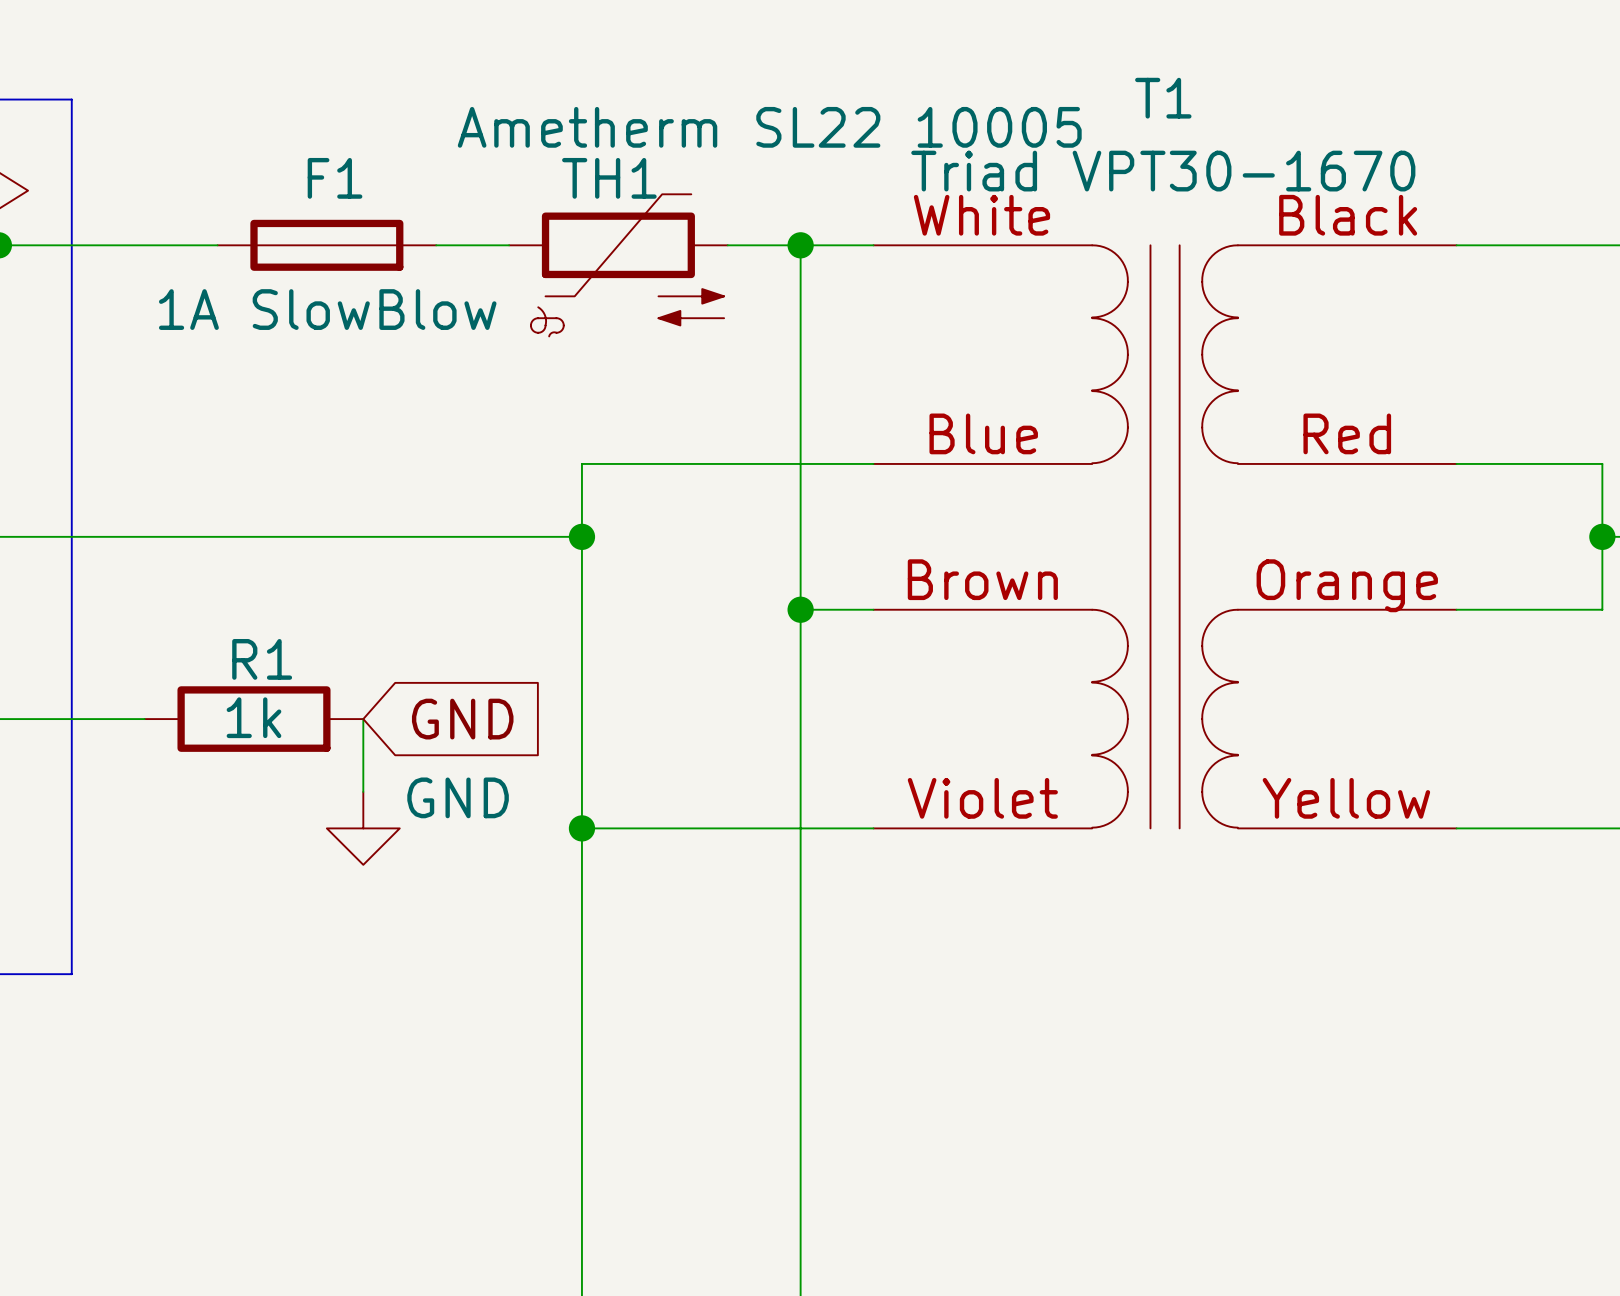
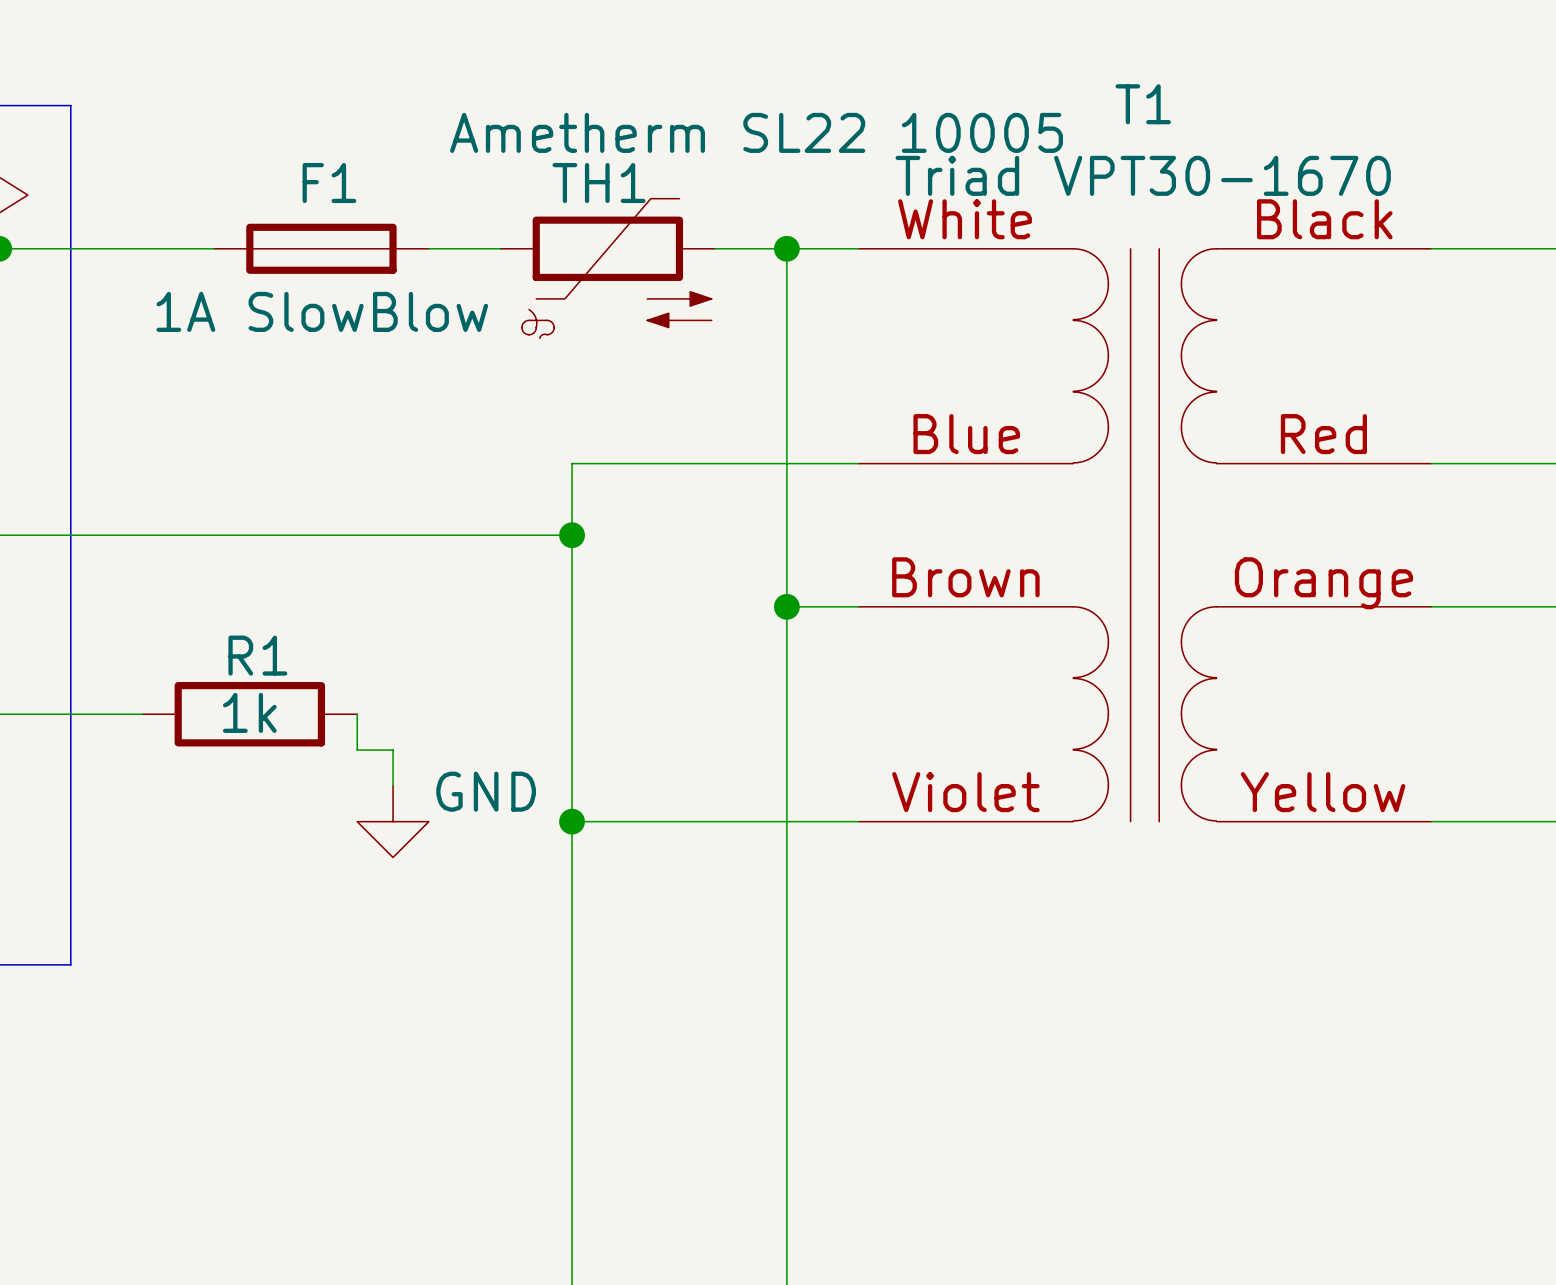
global label: GND (462, 719) -> none
wire: (363, 755) (363, 791) -> (357, 750) (393, 750) (393, 785)
power symbol position: GND (363, 828) -> GND (393, 821)

